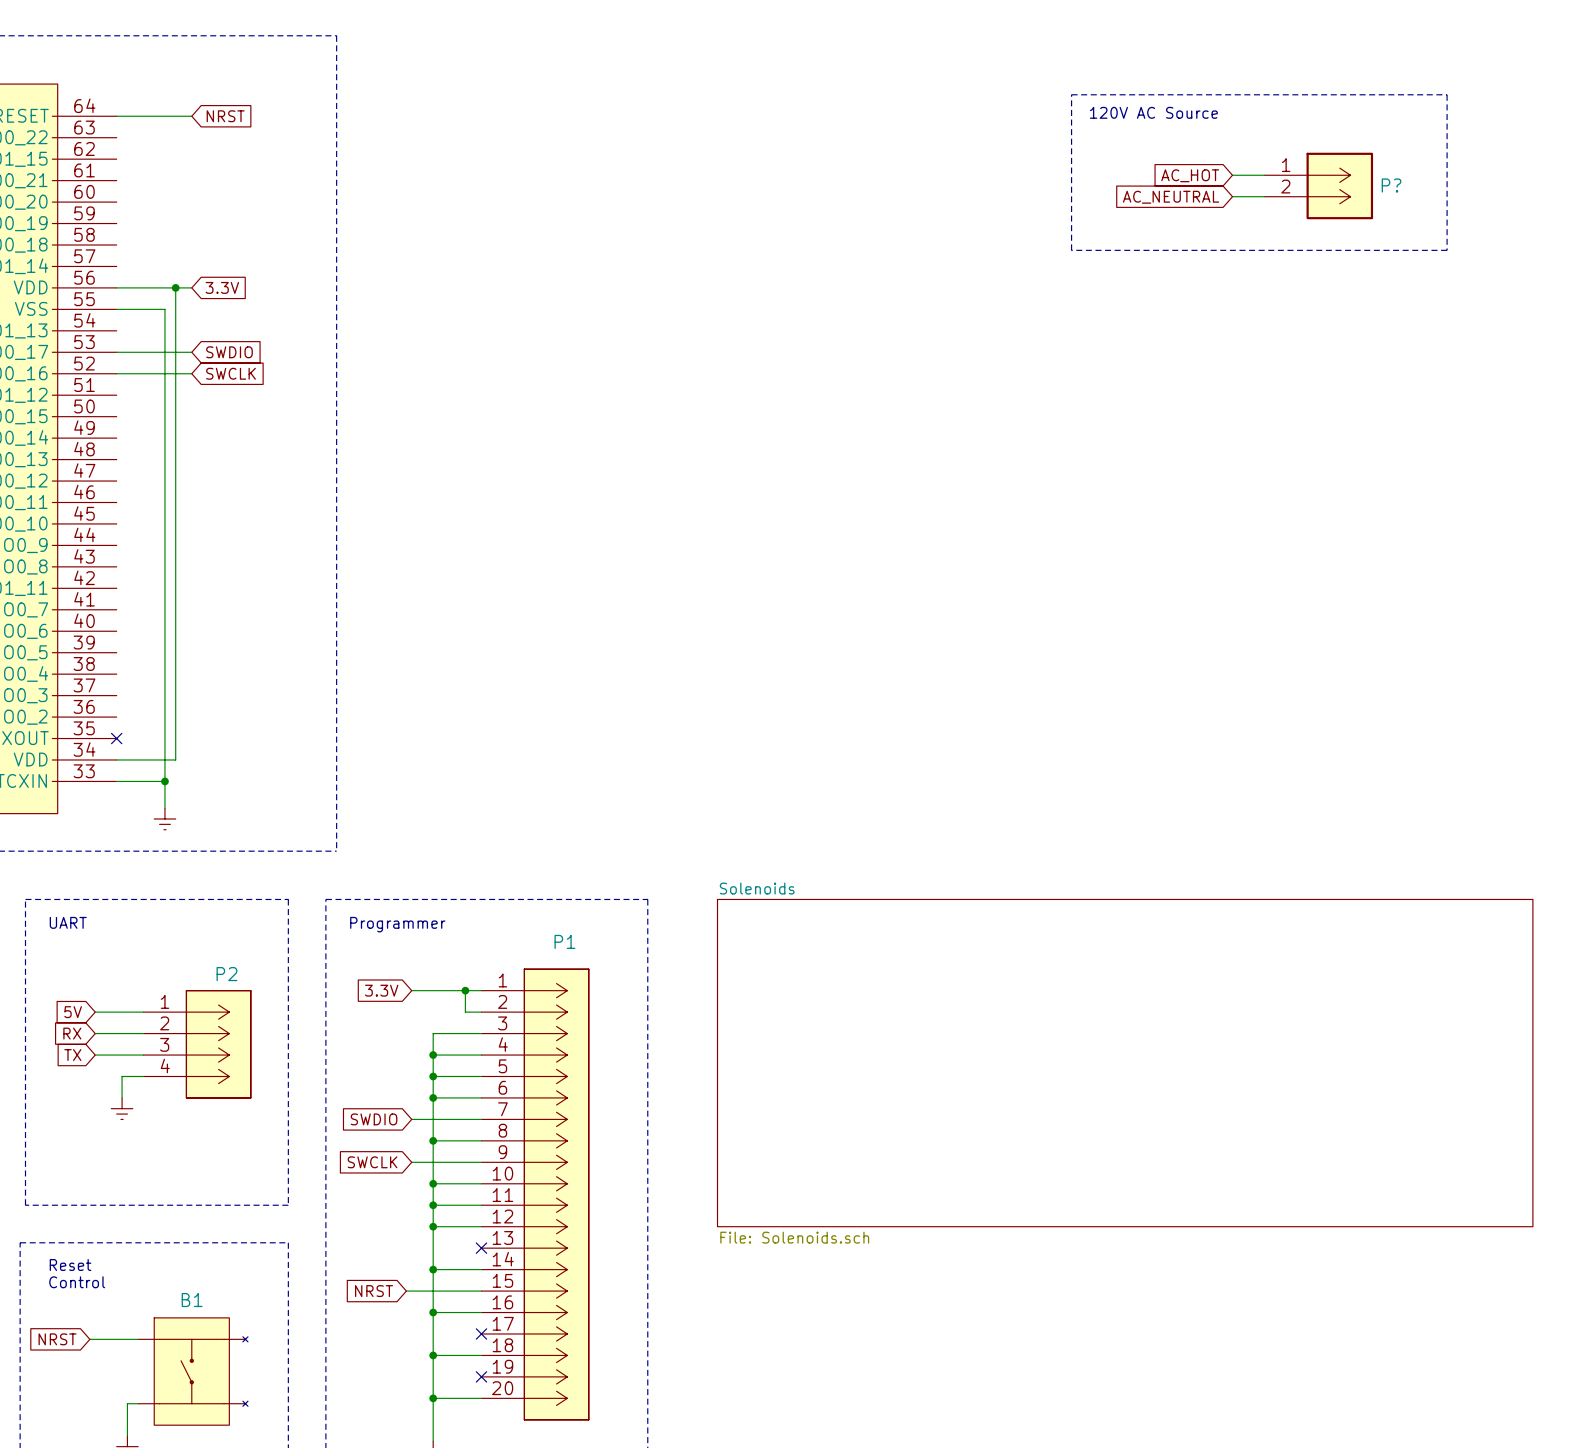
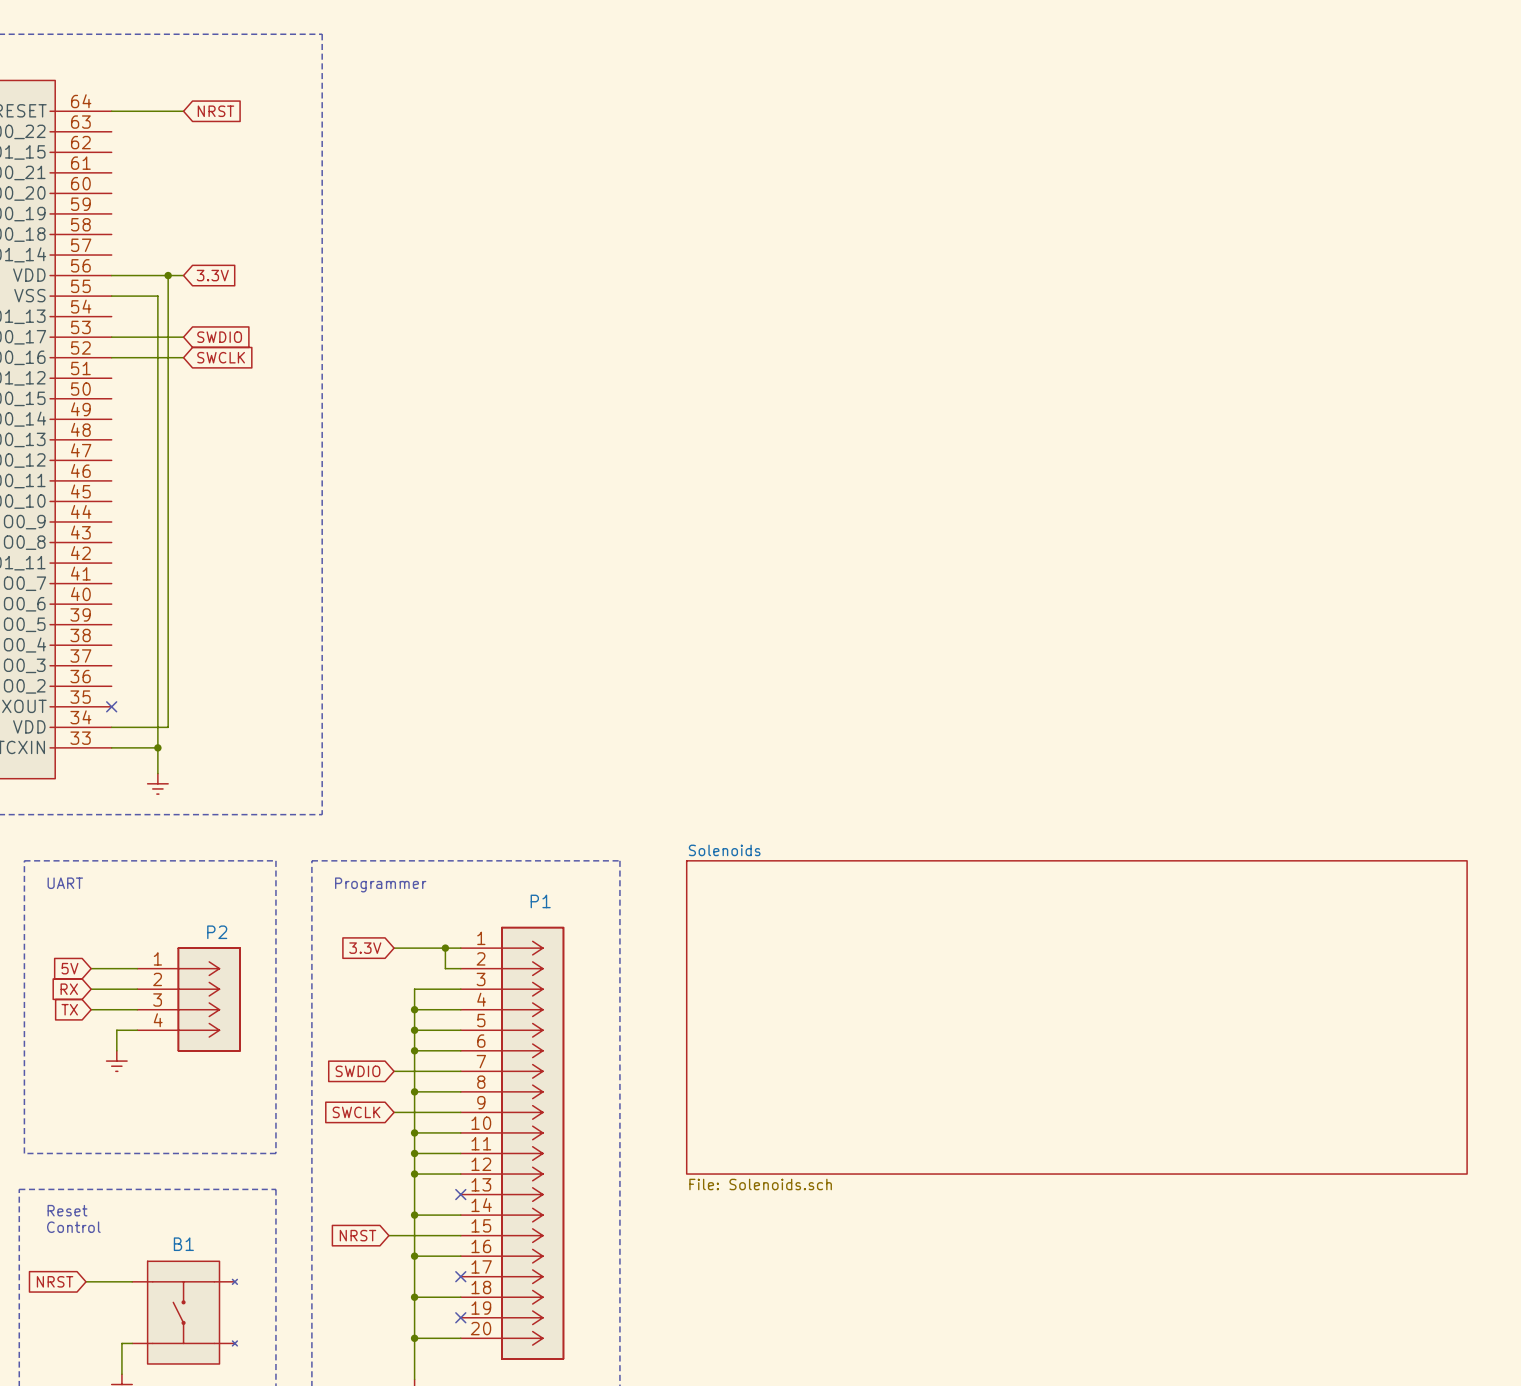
line: (1071, 94) (1447, 94) (1447, 250) (1071, 250) (1071, 94) -> none
text: 120V AC Source (1153, 112) -> none
global label: AC_HOT (1190, 175) -> none
wire: (1232, 175) (1264, 175) -> none
P?: (1318, 185) -> none
wire: (1232, 196) (1264, 196) -> none
global label: AC_NEUTRAL (1171, 197) -> none

